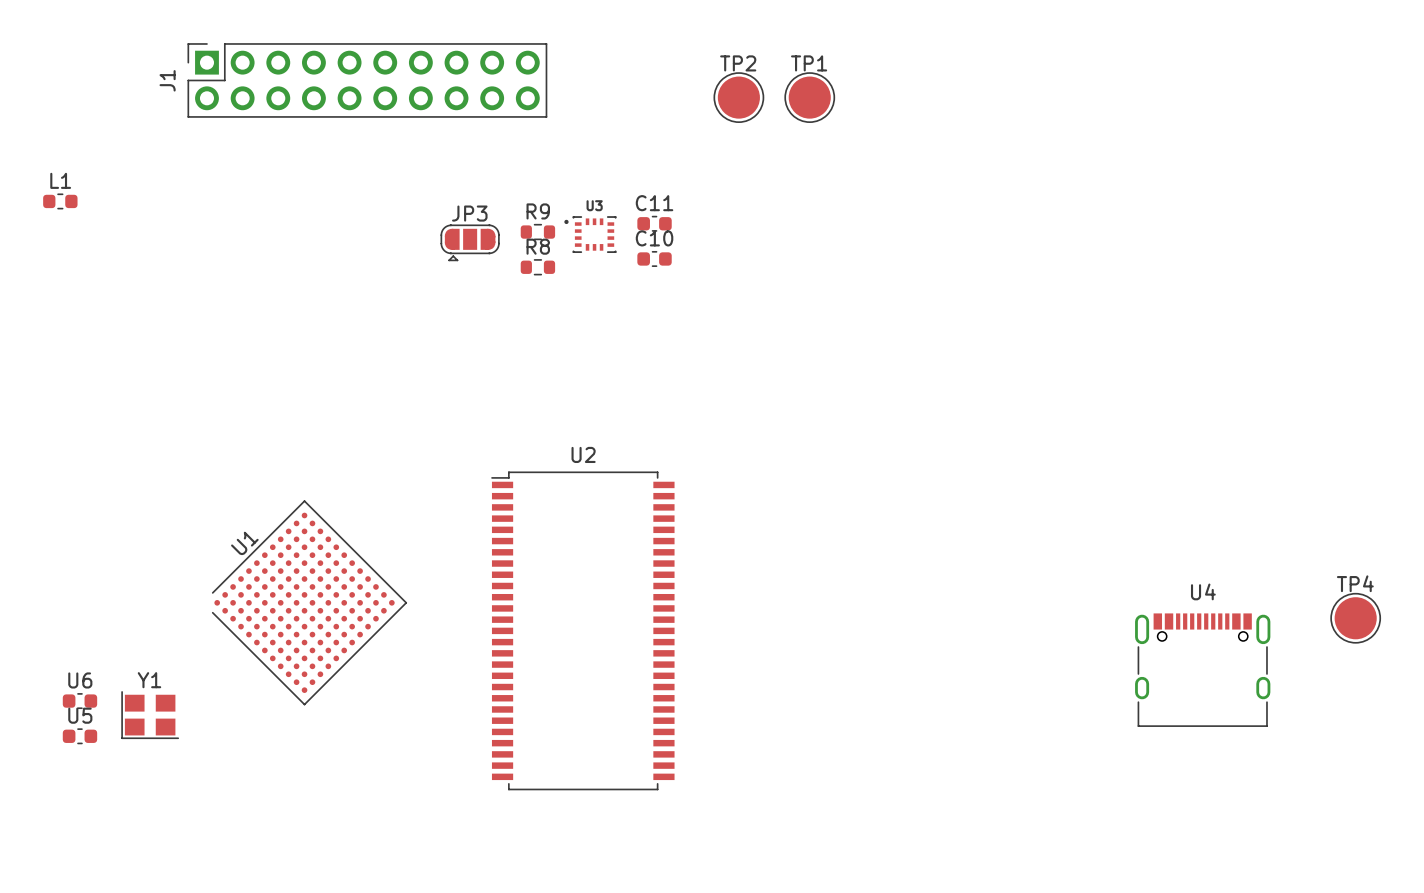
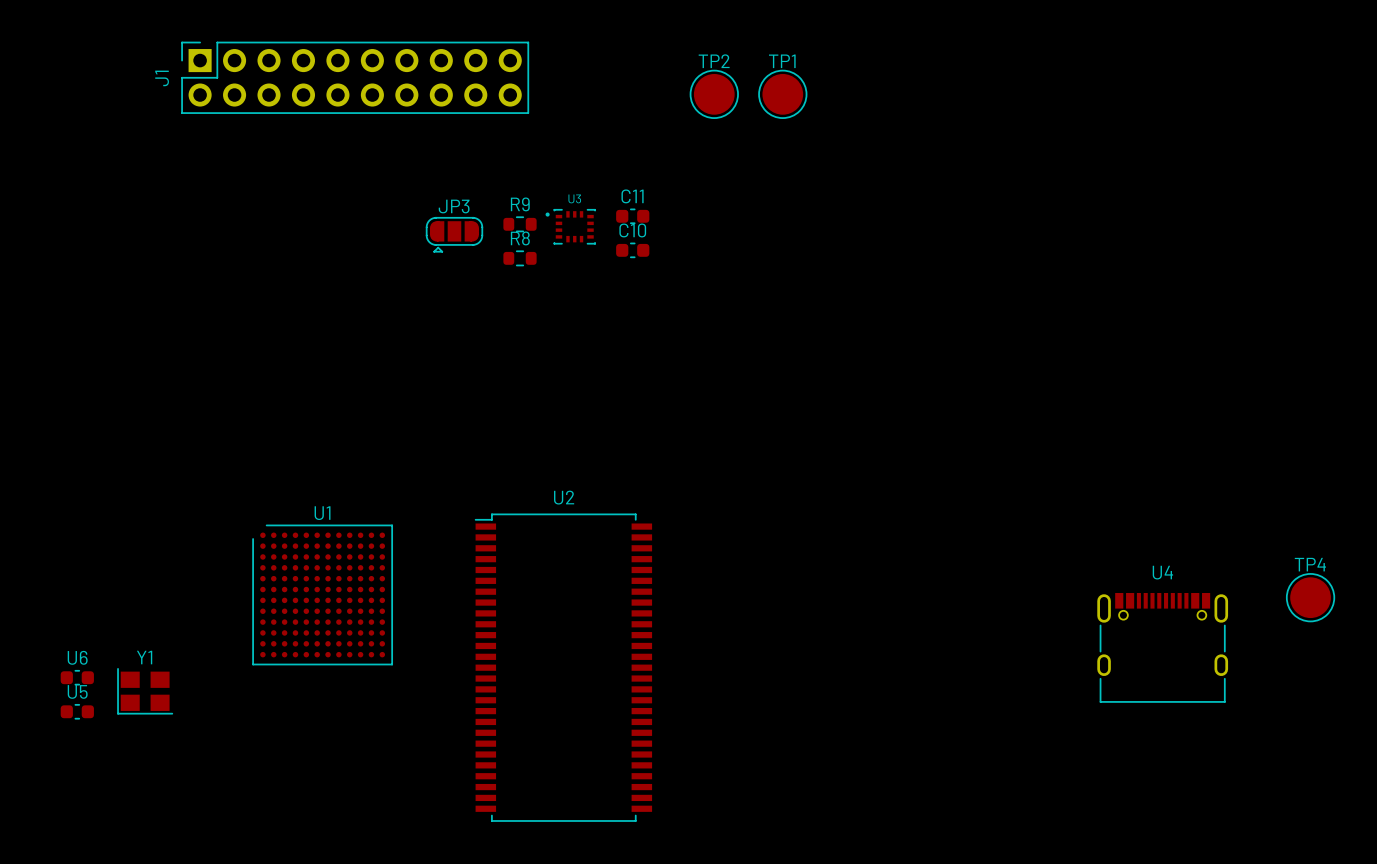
L1: (60, 201) -> none
U1 rotation: 0° (309, 602) -> 45° clockwise (322, 594)
U2 position: (582, 630) -> (563, 667)

